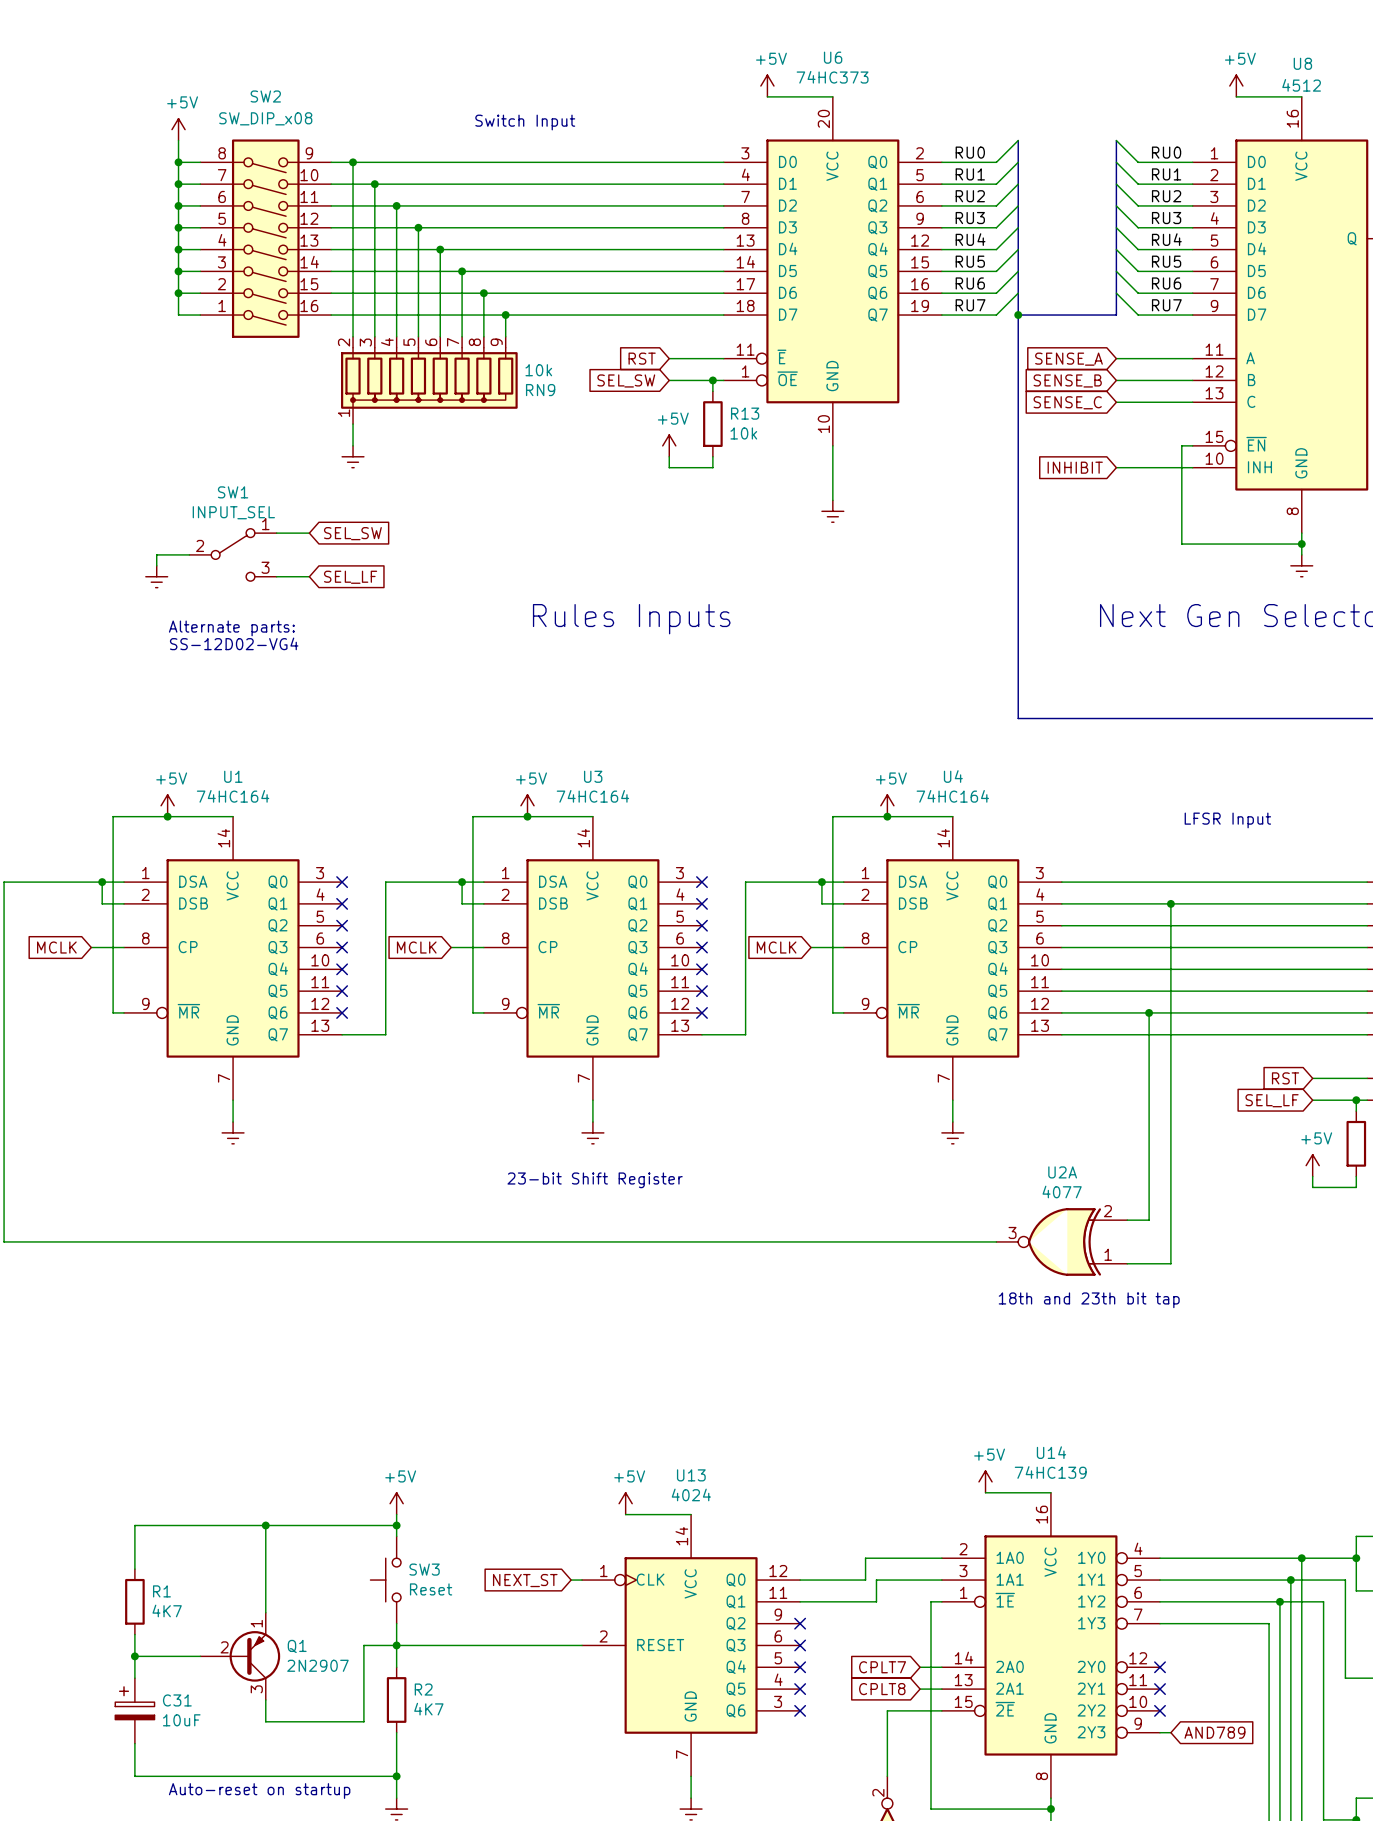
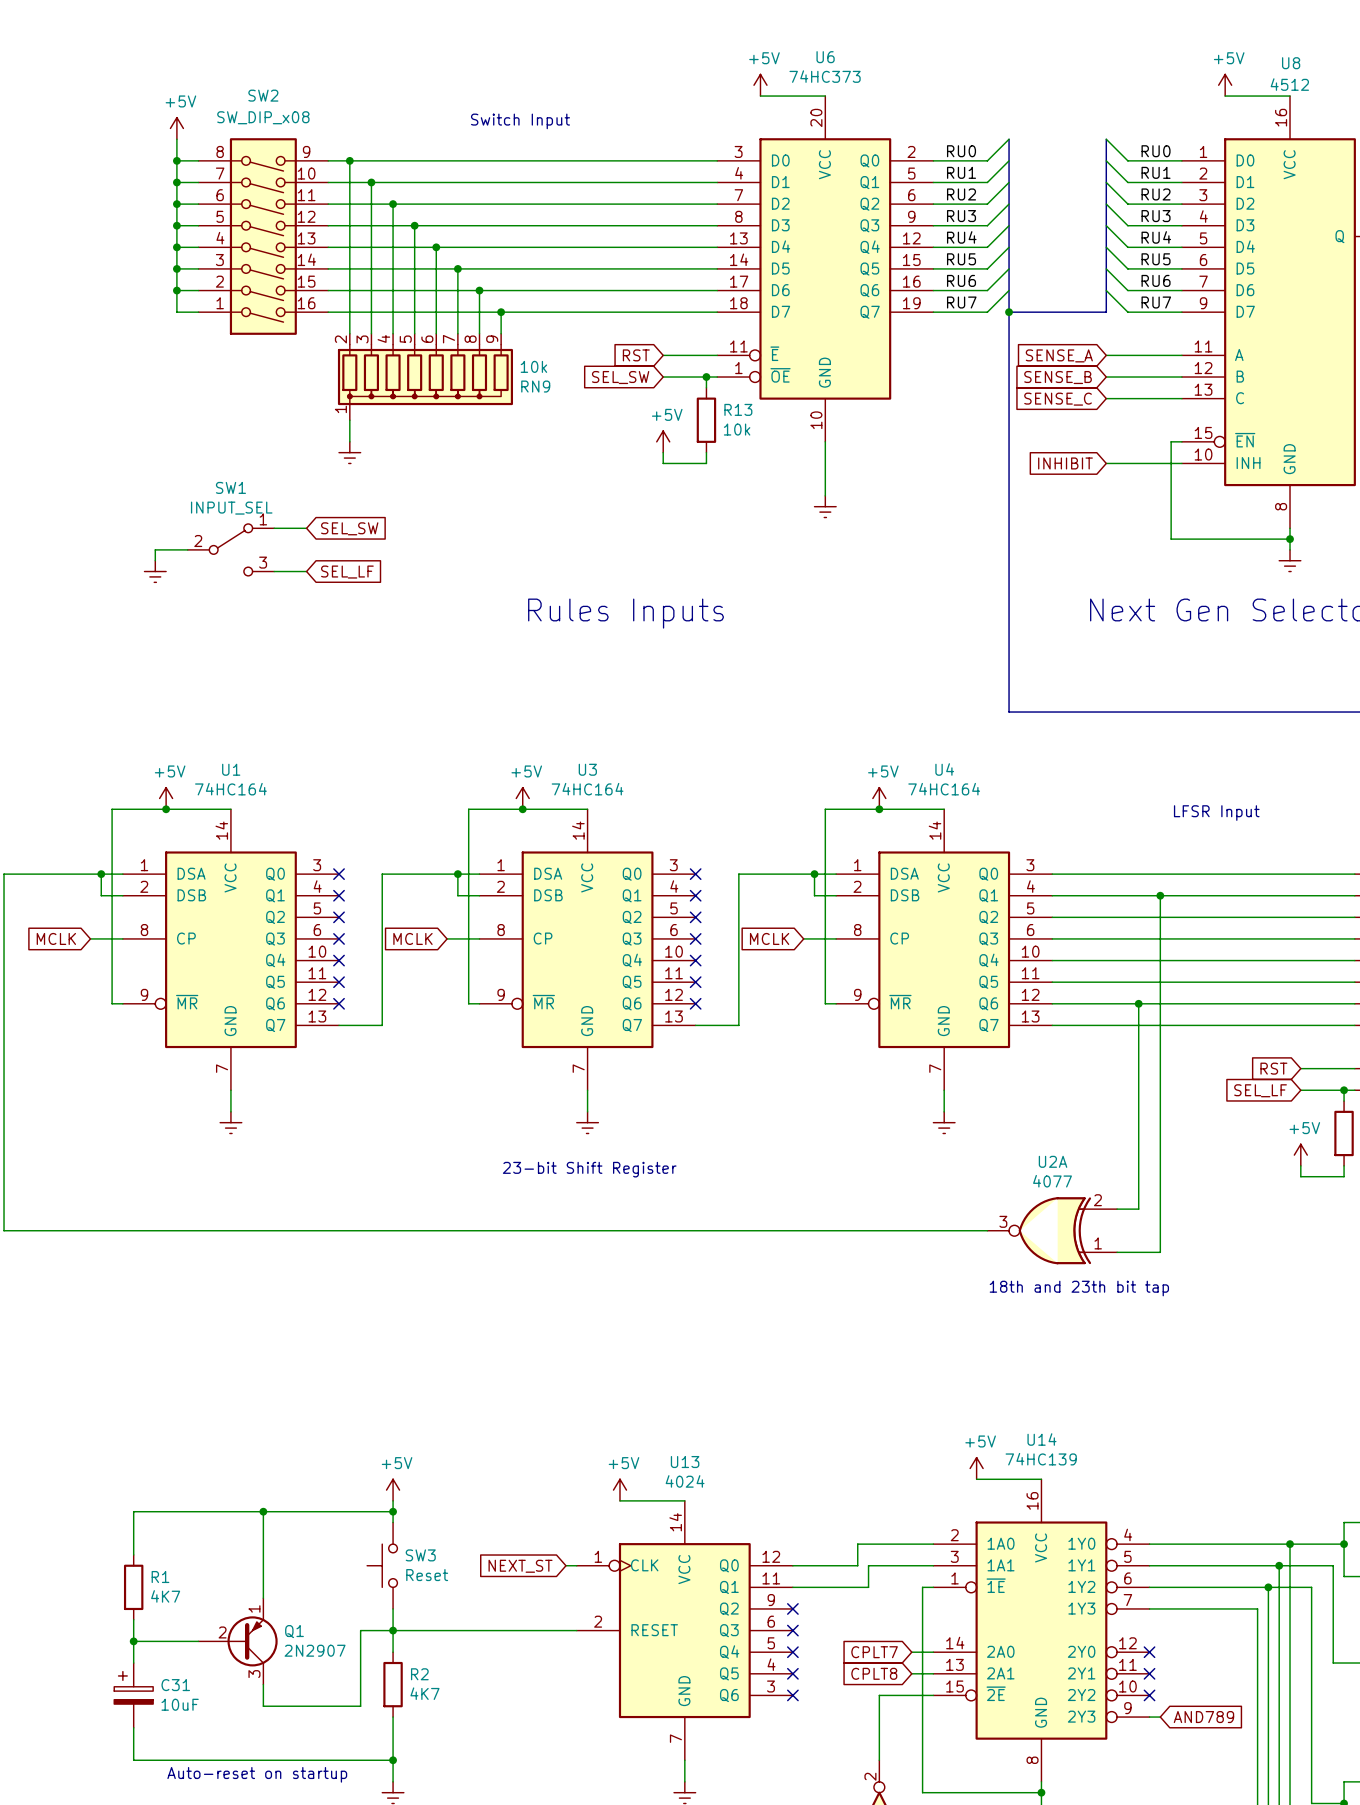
text: Alternate parts: (231, 628) -> none
text: SS-12D02-VG4 (234, 643) -> none

